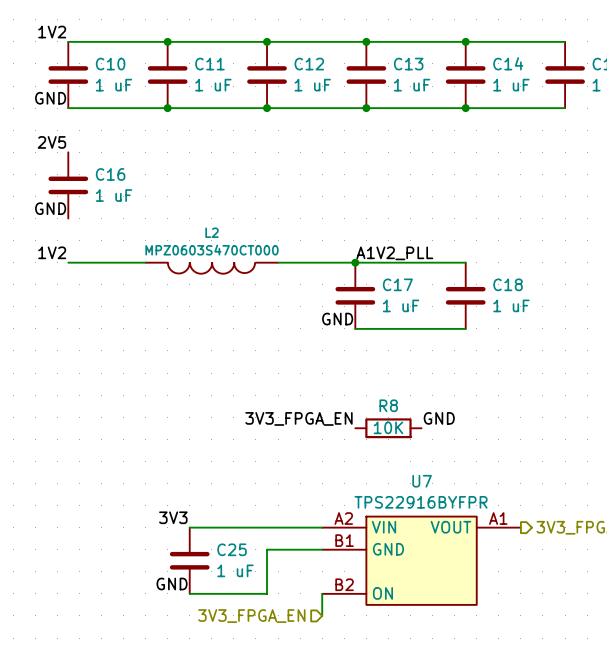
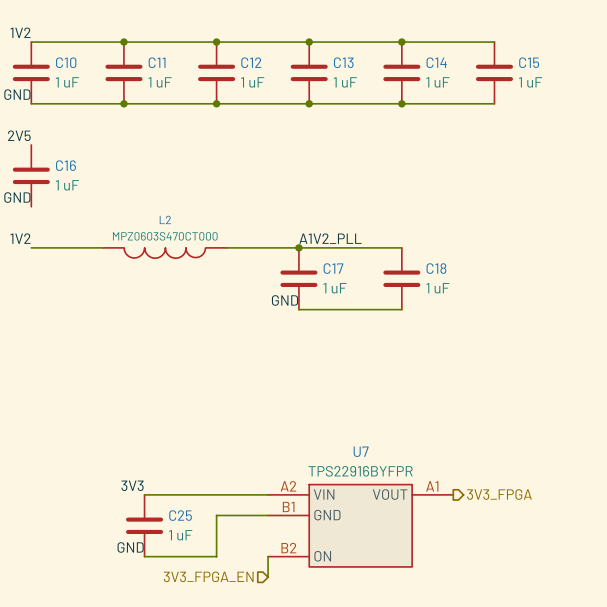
label: 3V3_FPGA_EN (298, 418) -> none
label: GND (439, 418) -> none
R8: 10K (388, 428) -> none

